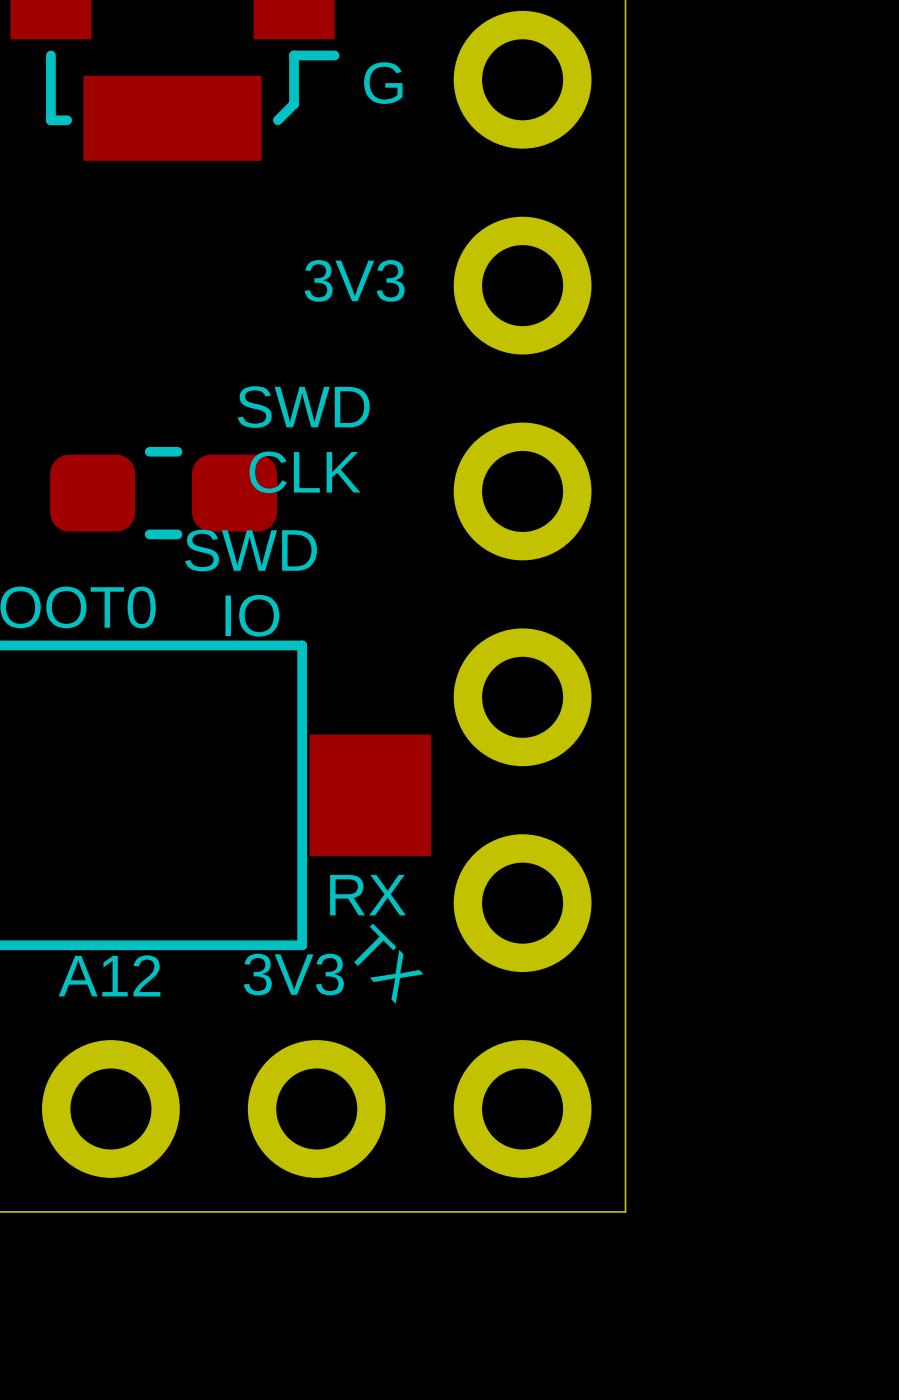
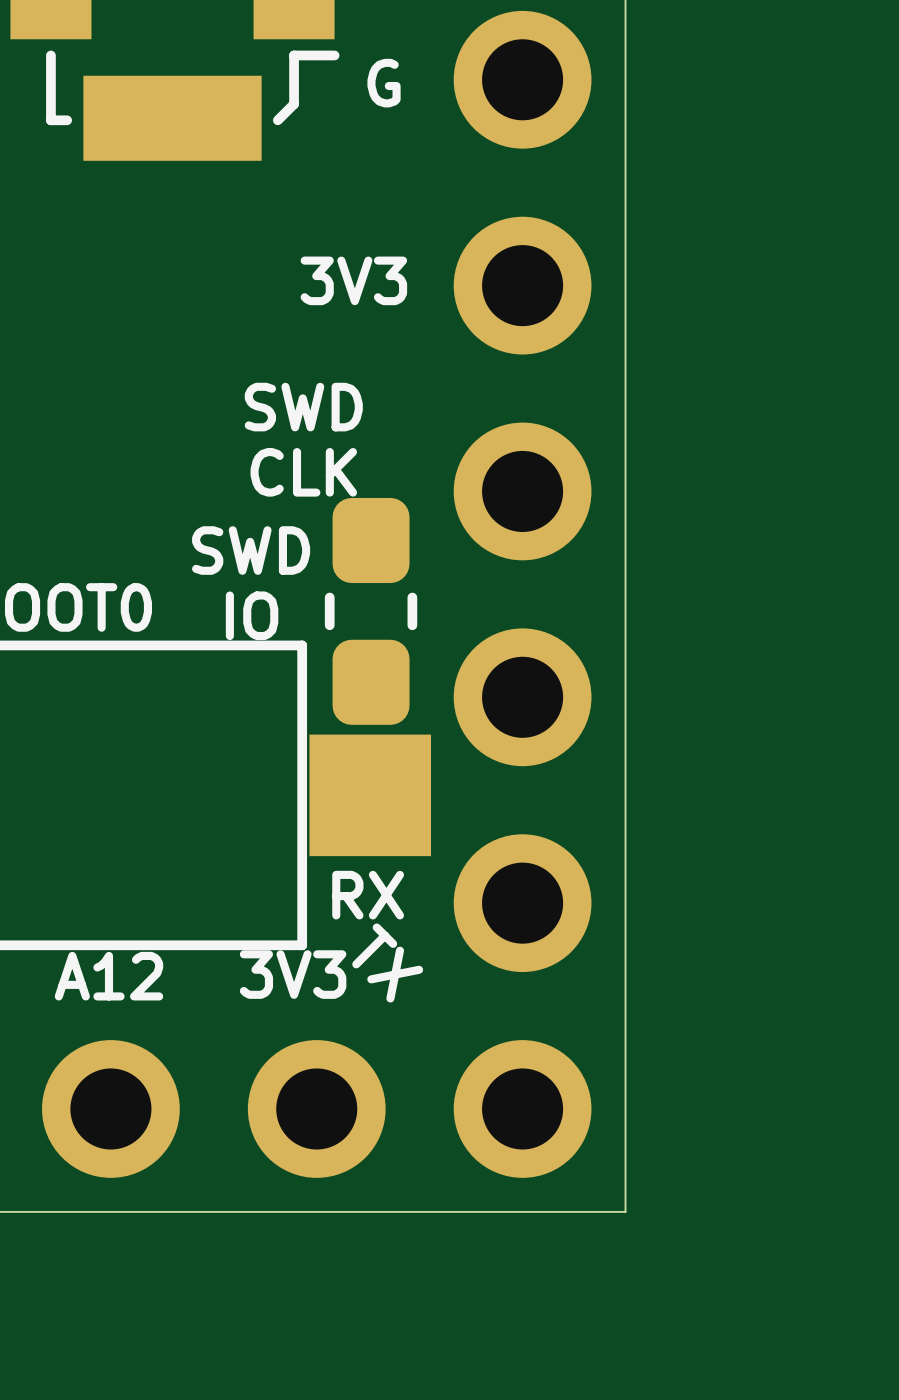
part rotation: 0° (163, 493) -> 90° clockwise (371, 611)
part position: (163, 493) -> (371, 611)

